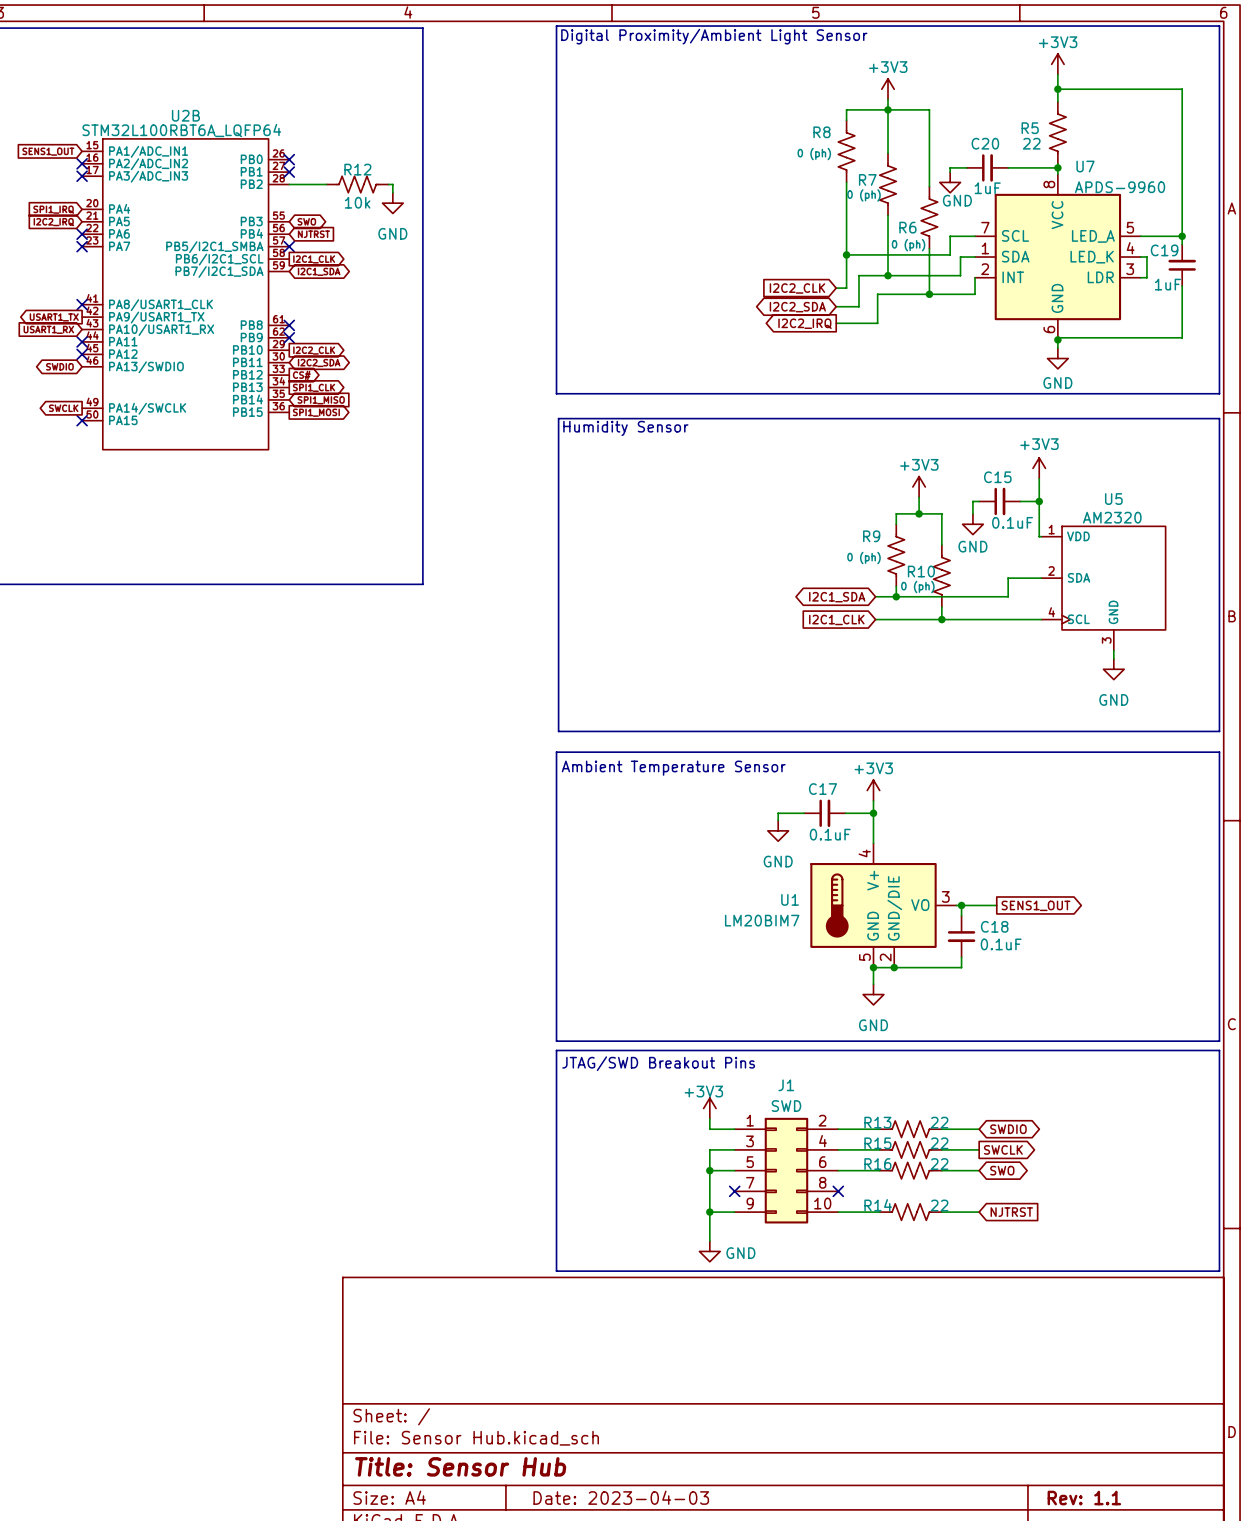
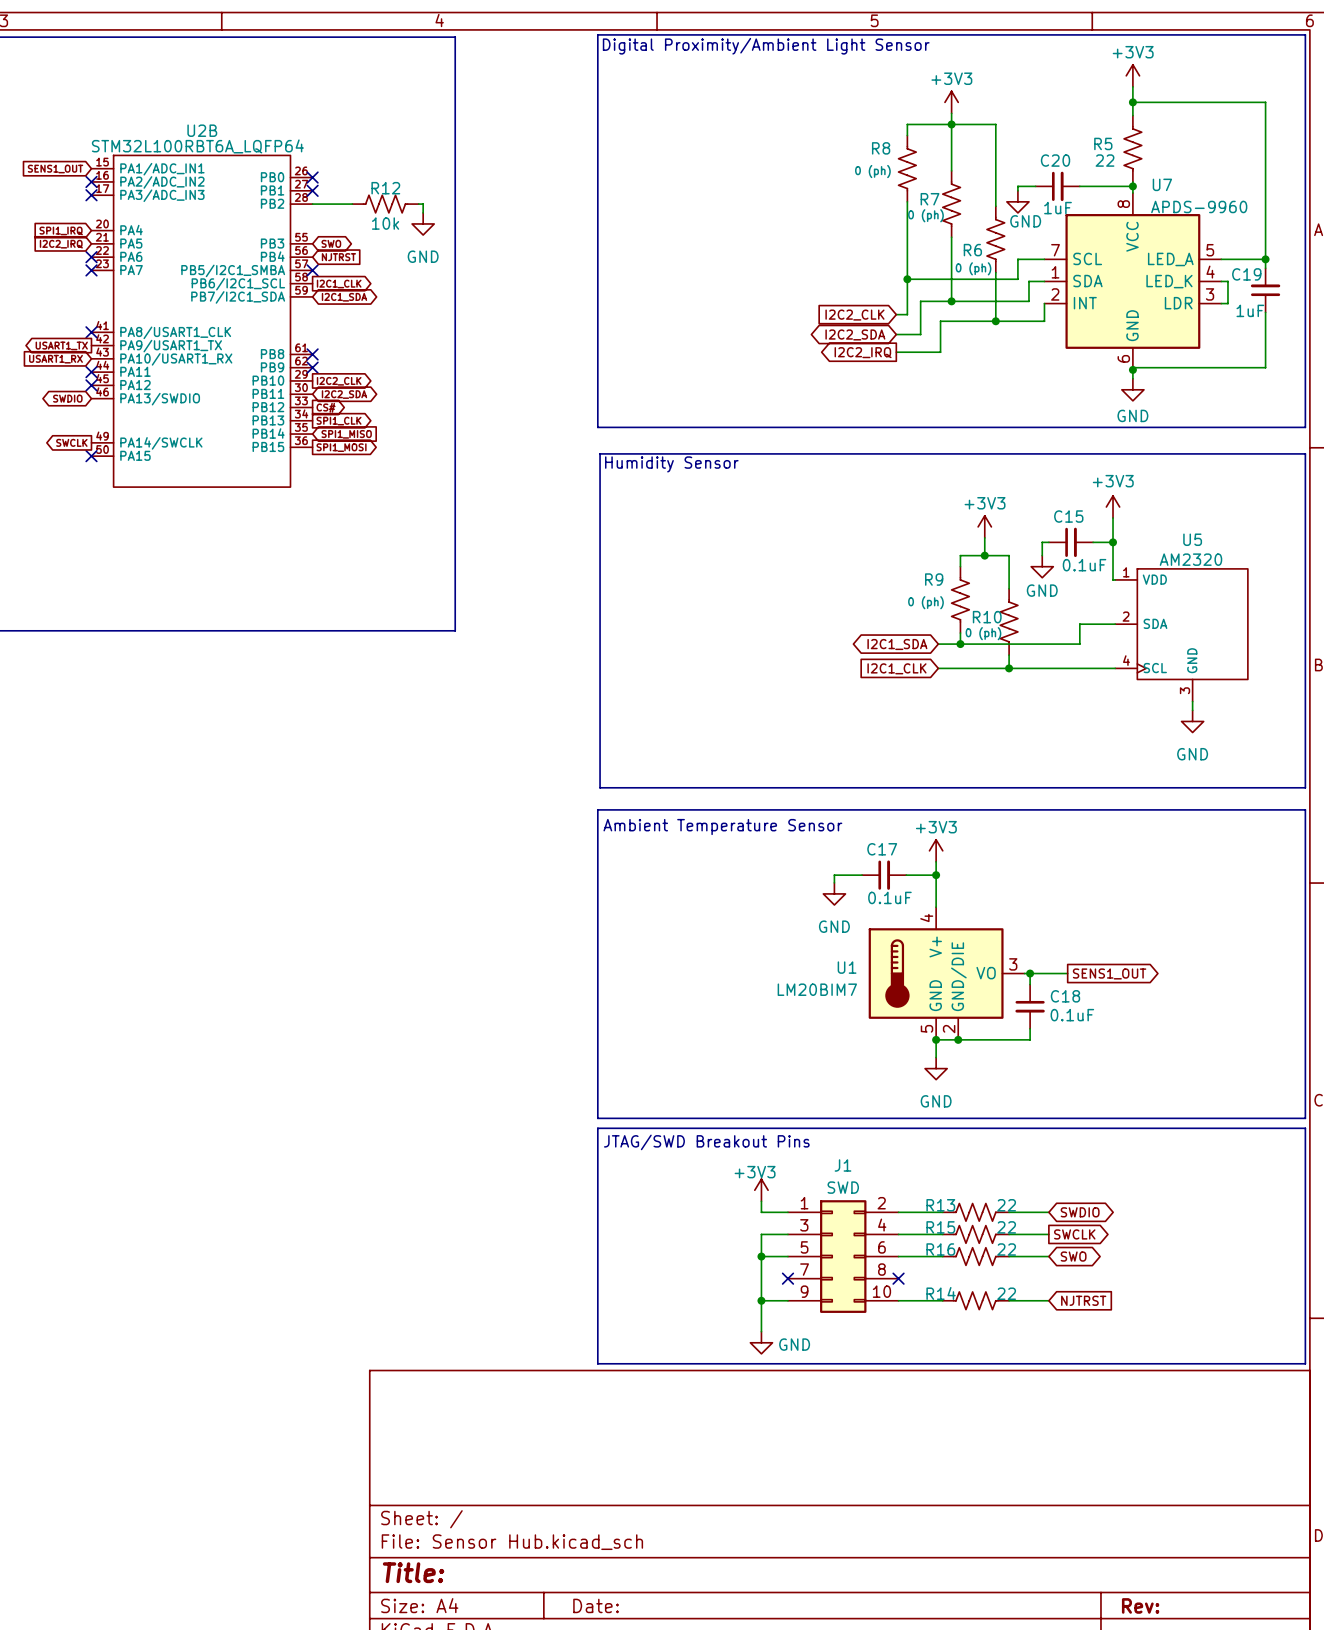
title block: Title: Sensor Hub (460, 1466) -> Title: (413, 1572)
title block: Date: 2023-04-03 (621, 1497) -> Date: (596, 1605)
title block: Rev: 1.1 (1084, 1498) -> Rev: (1140, 1605)

